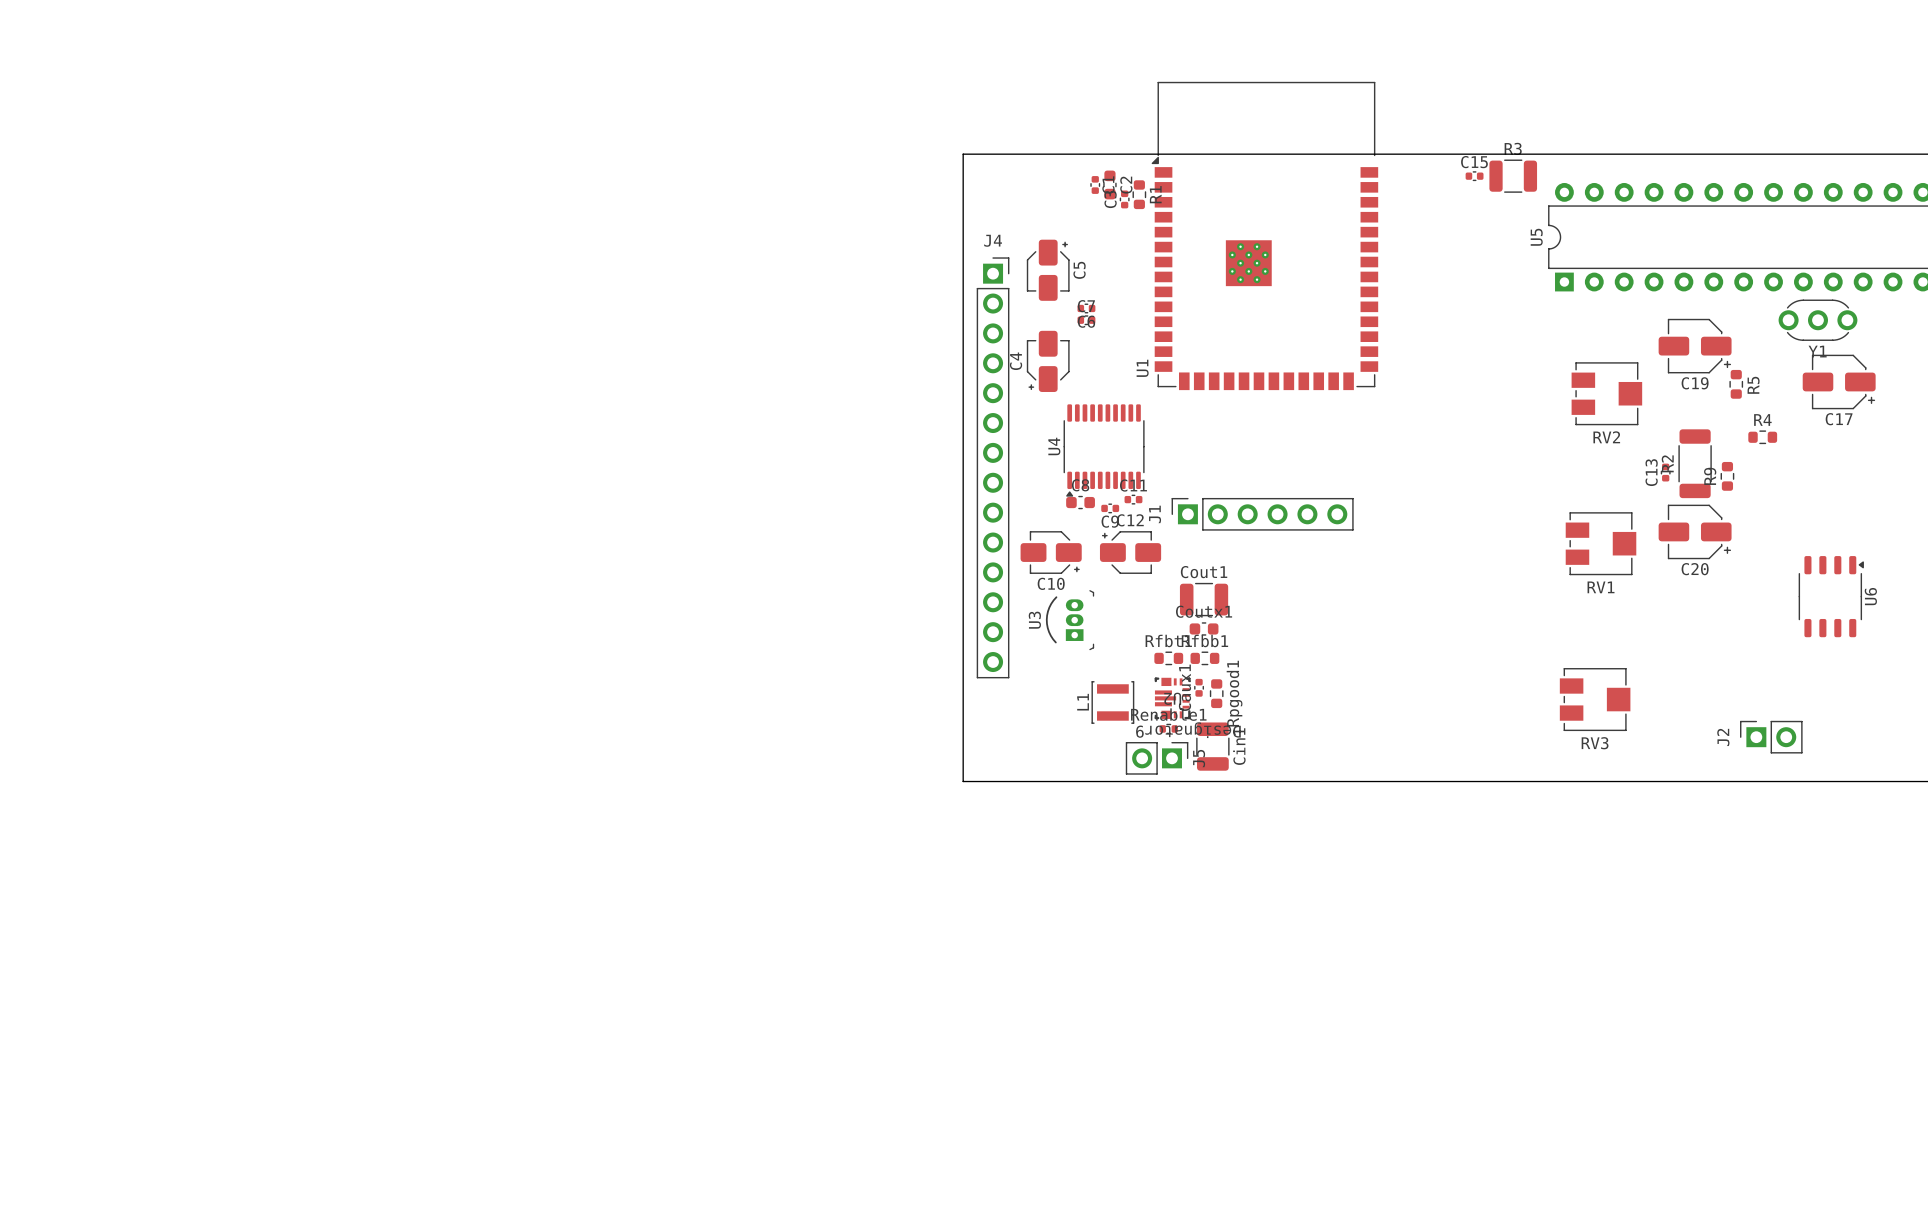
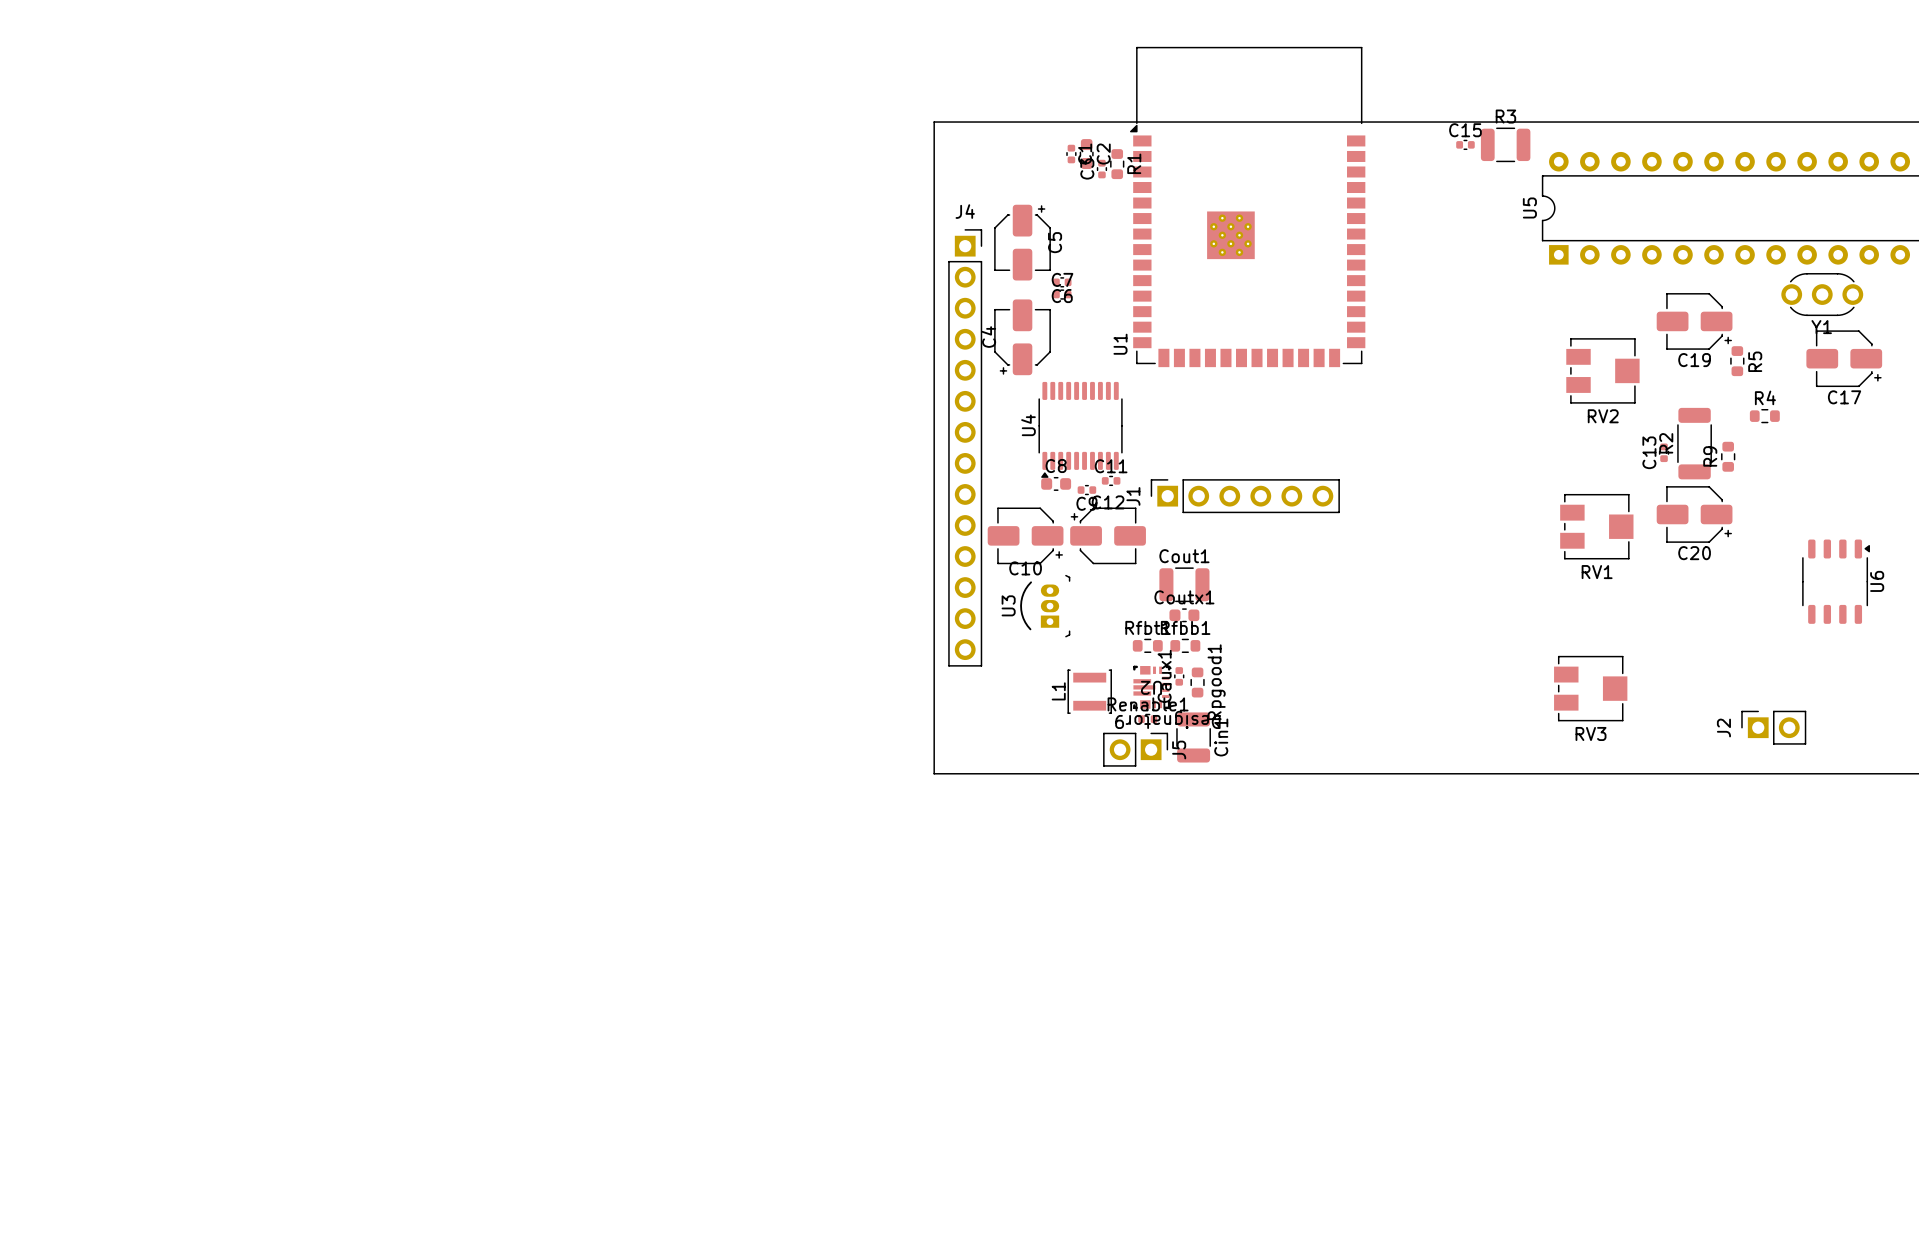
C5 footprint: [1026, 239, 1070, 301] -> [994, 204, 1051, 281]
C4 footprint: [1026, 330, 1070, 392] -> [994, 299, 1051, 376]
C10 footprint: [1020, 531, 1082, 574] -> [987, 507, 1064, 565]
C12 footprint: [1099, 531, 1162, 574] -> [1070, 507, 1146, 565]

